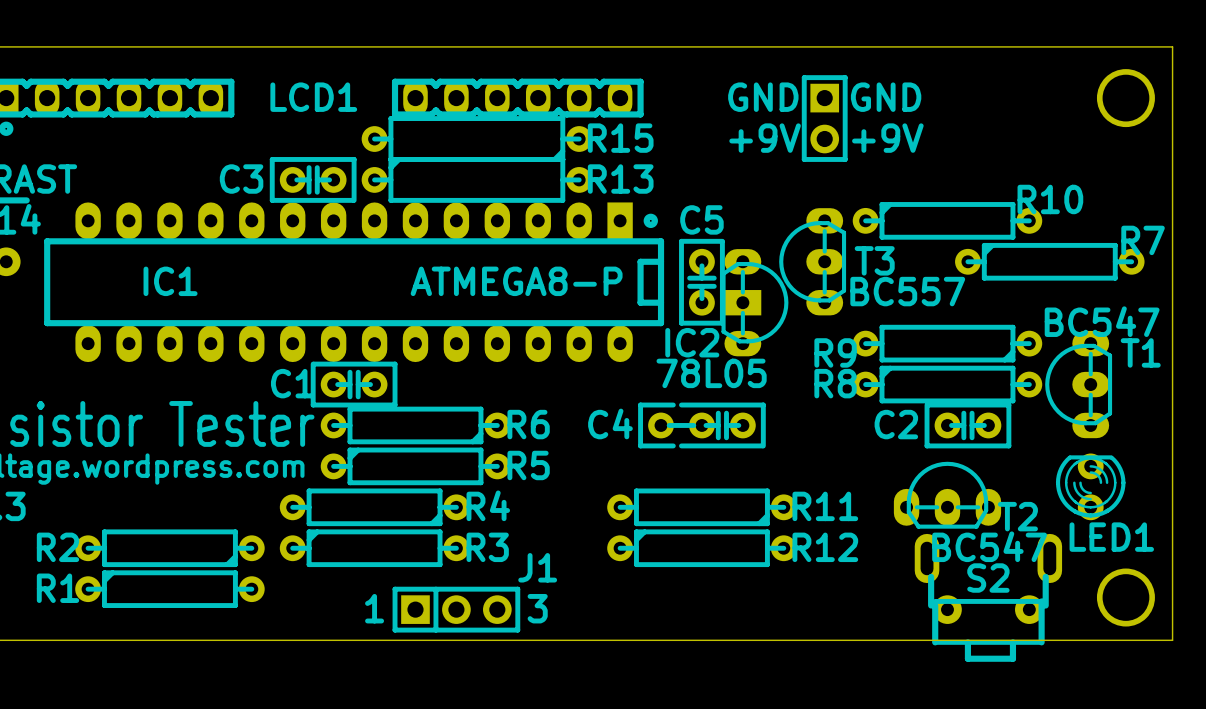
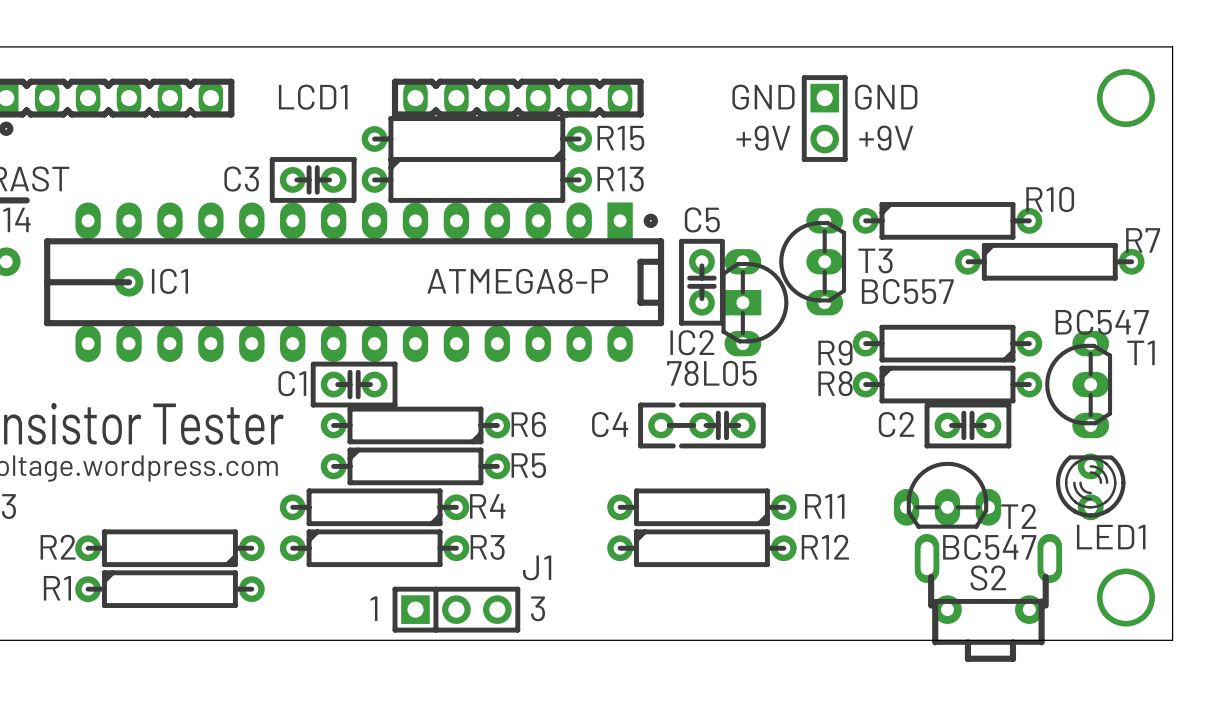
line: none -> (47, 282) (129, 282)
part: none -> (129, 282)

